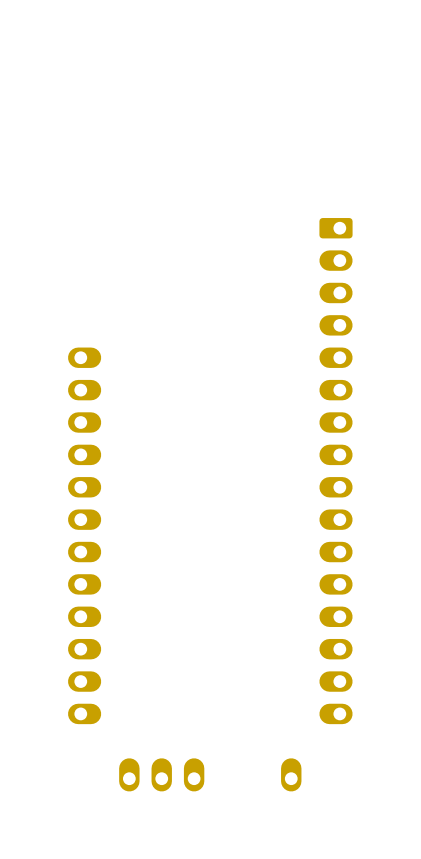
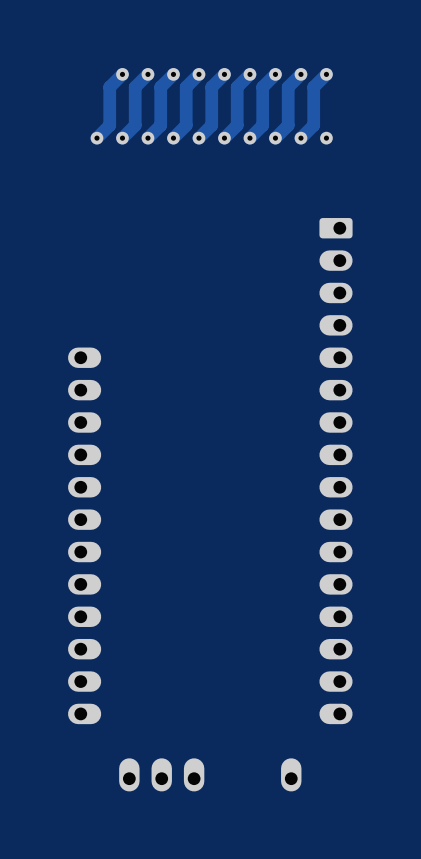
part: none -> (211, 106)

